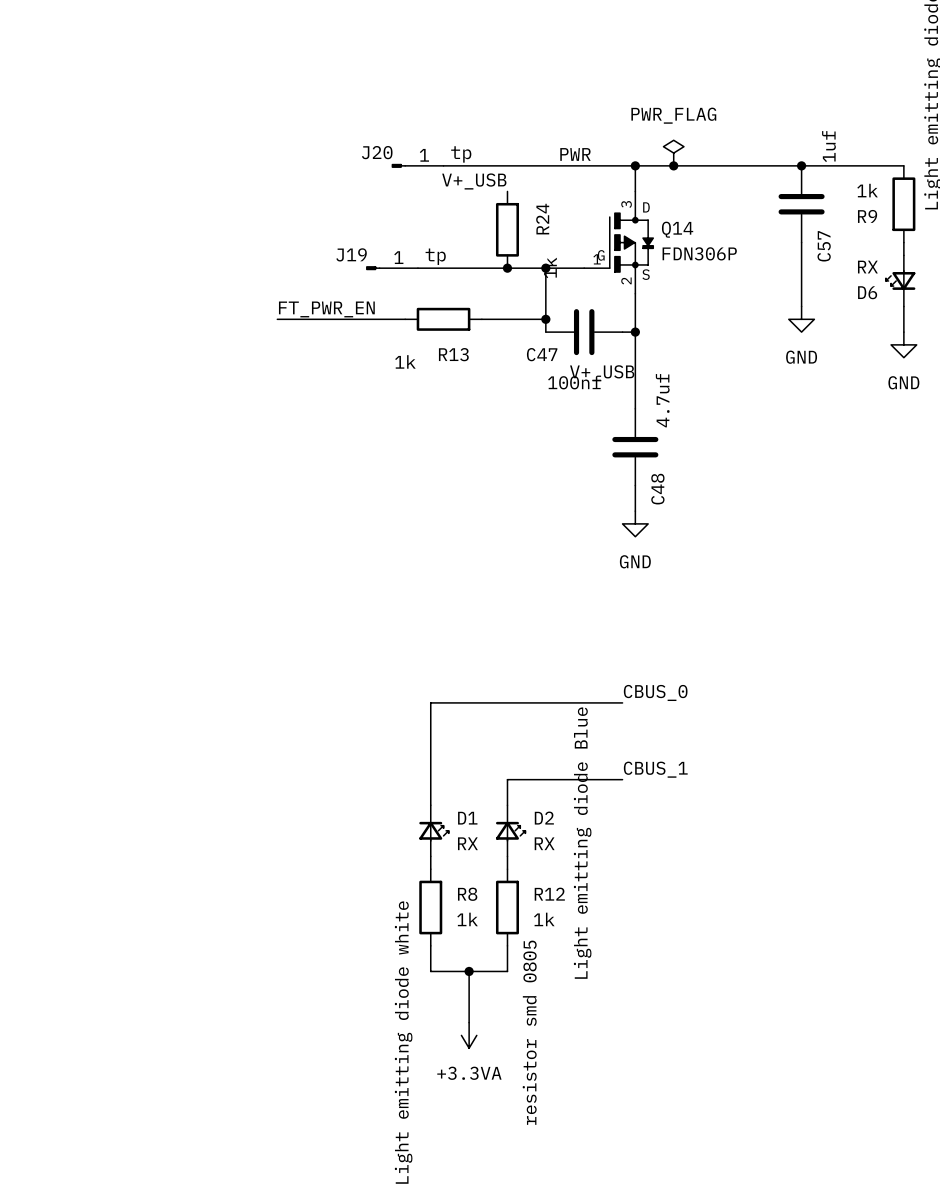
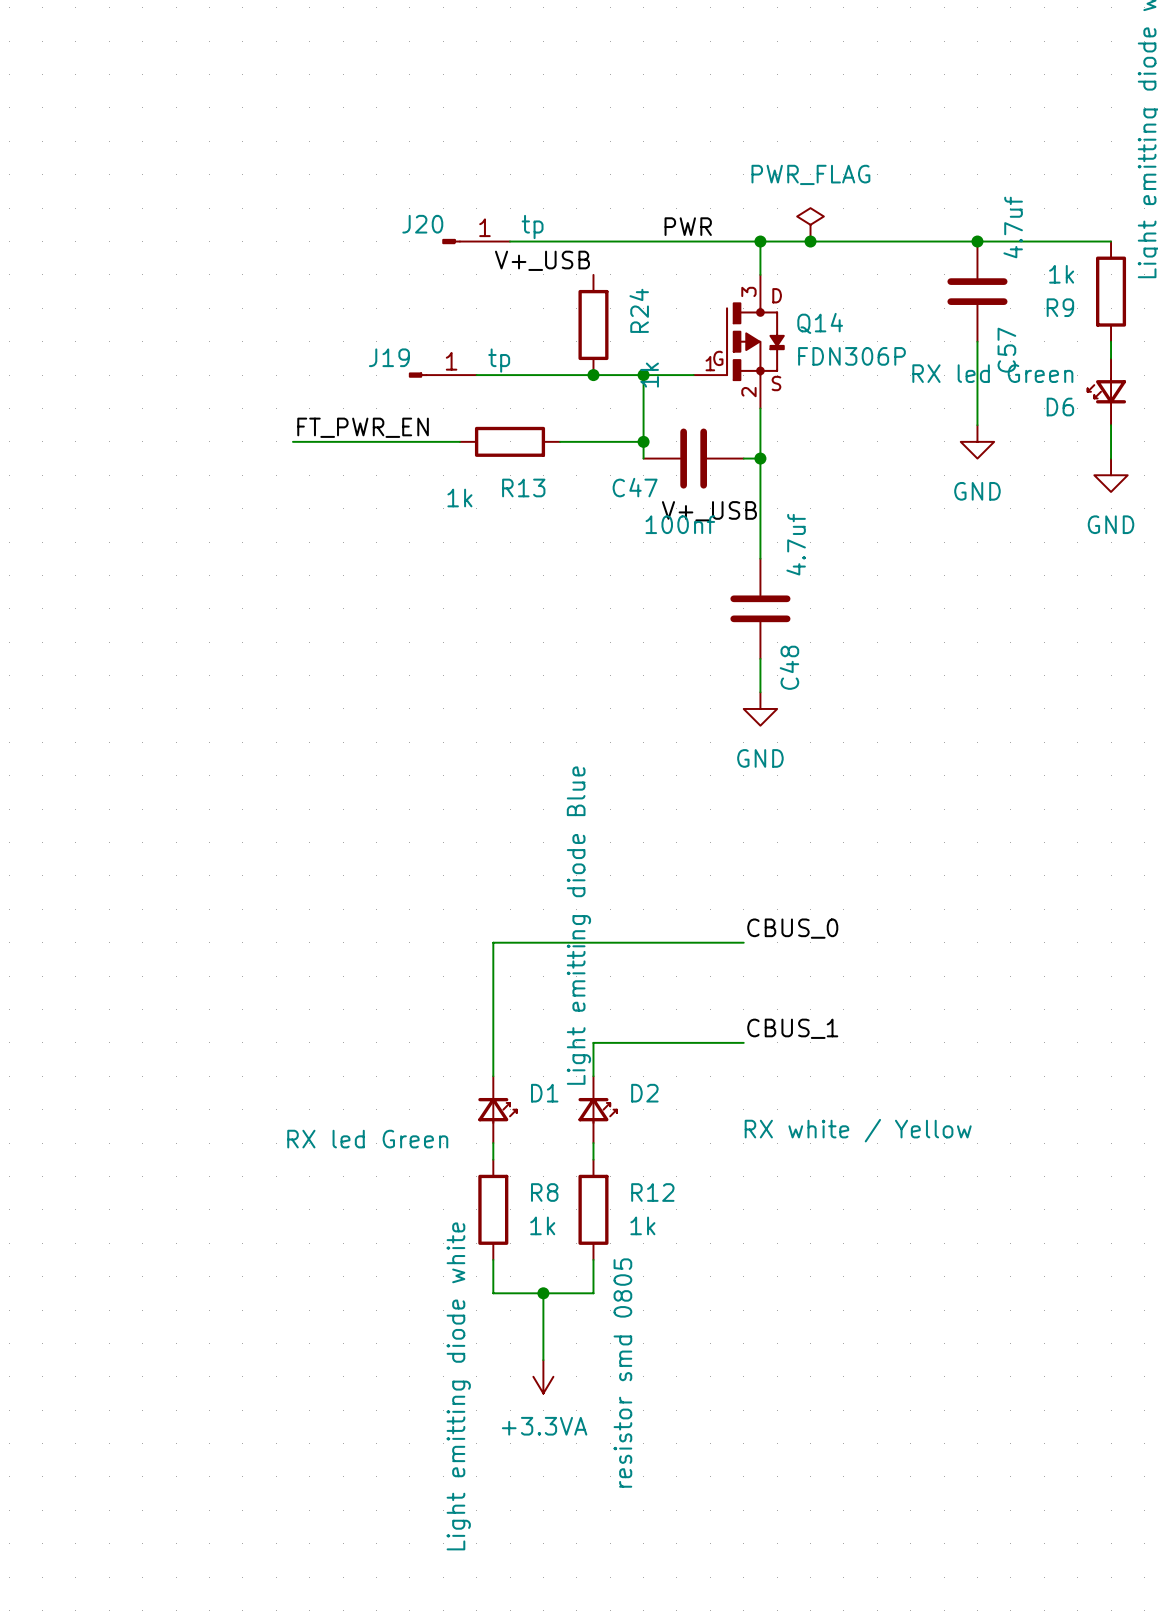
C57 value: 1uf (828, 146) -> 4.7uf (1013, 227)
D6 value: RX (867, 267) -> RX led Green (992, 373)
D1 value: RX (467, 843) -> RX led Green (367, 1139)
D2 value: RX (544, 843) -> RX white / Yellow (858, 1130)
D2 text position: Light emitting diode Blue (582, 843) -> Light emitting diode Blue (578, 925)

